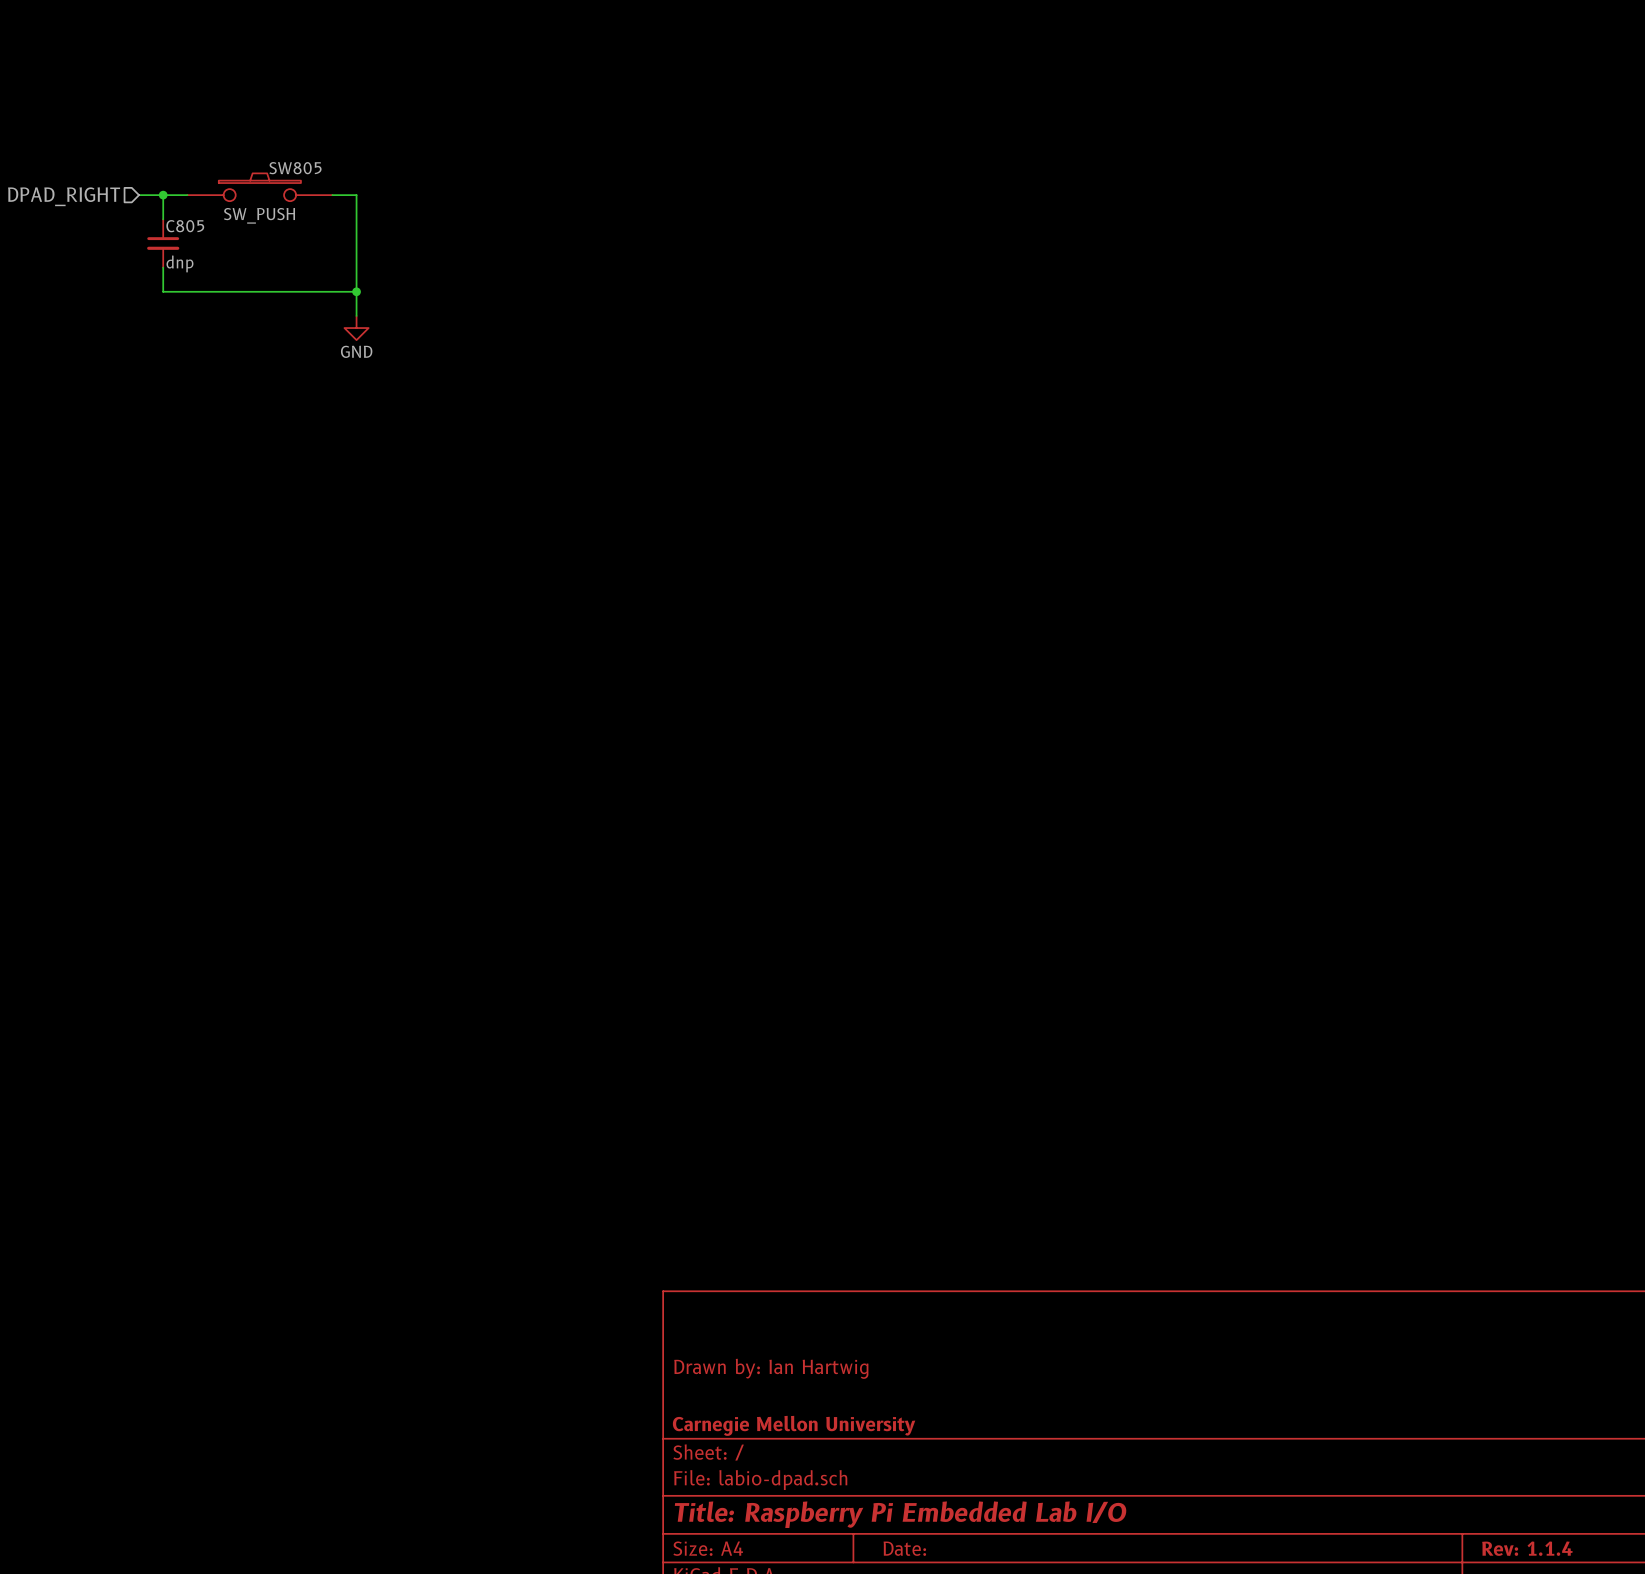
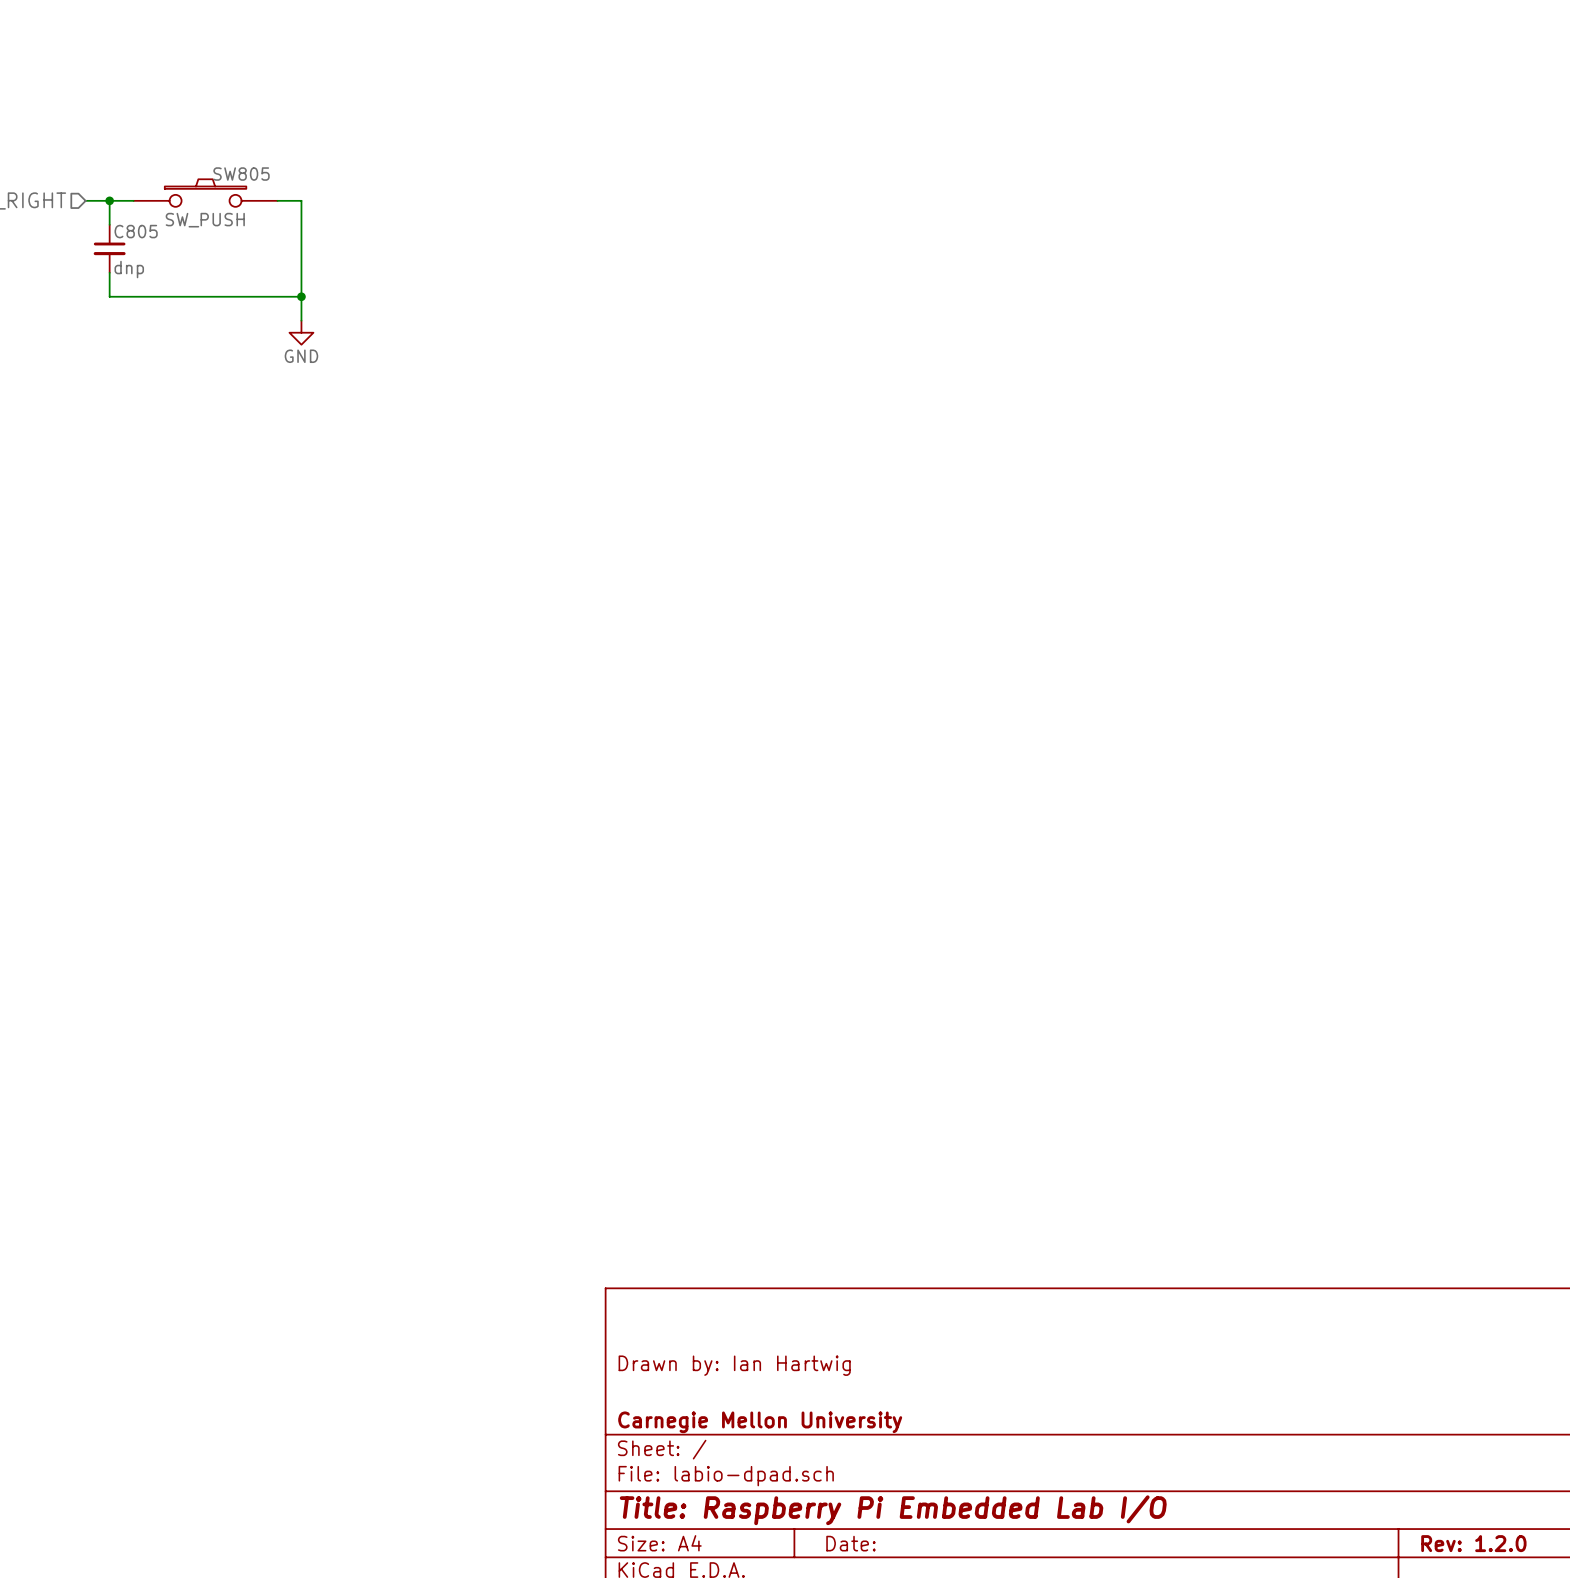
title block: Rev: 1.1.4 (1527, 1548) -> Rev: 1.2.0 (1473, 1543)

